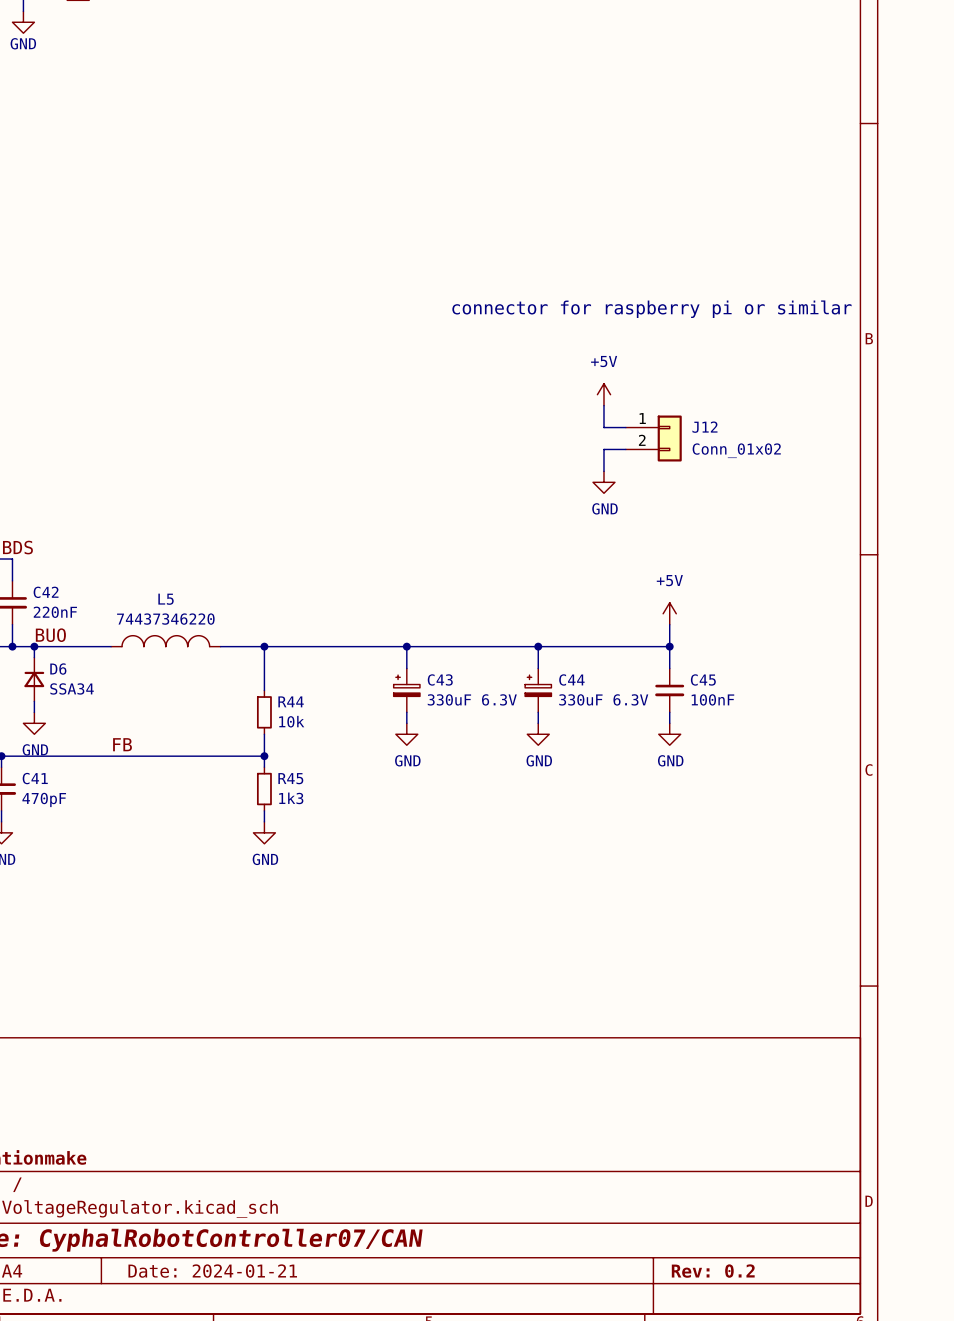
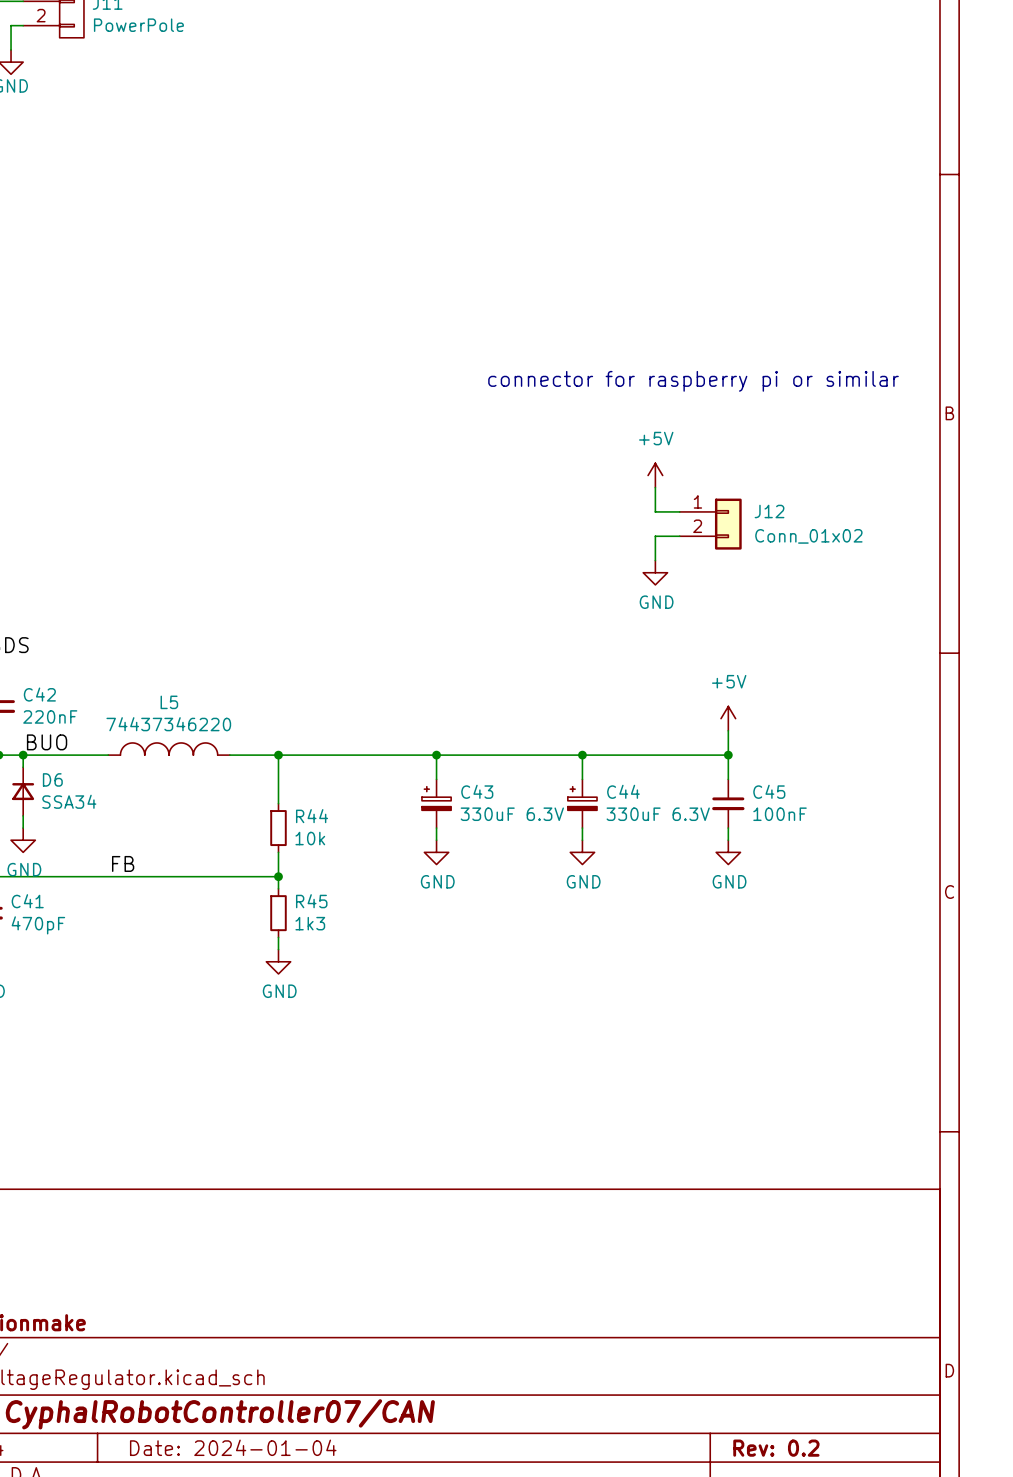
title block: Date: 2024-01-21 (212, 1271) -> Date: 2024-01-04 (233, 1447)

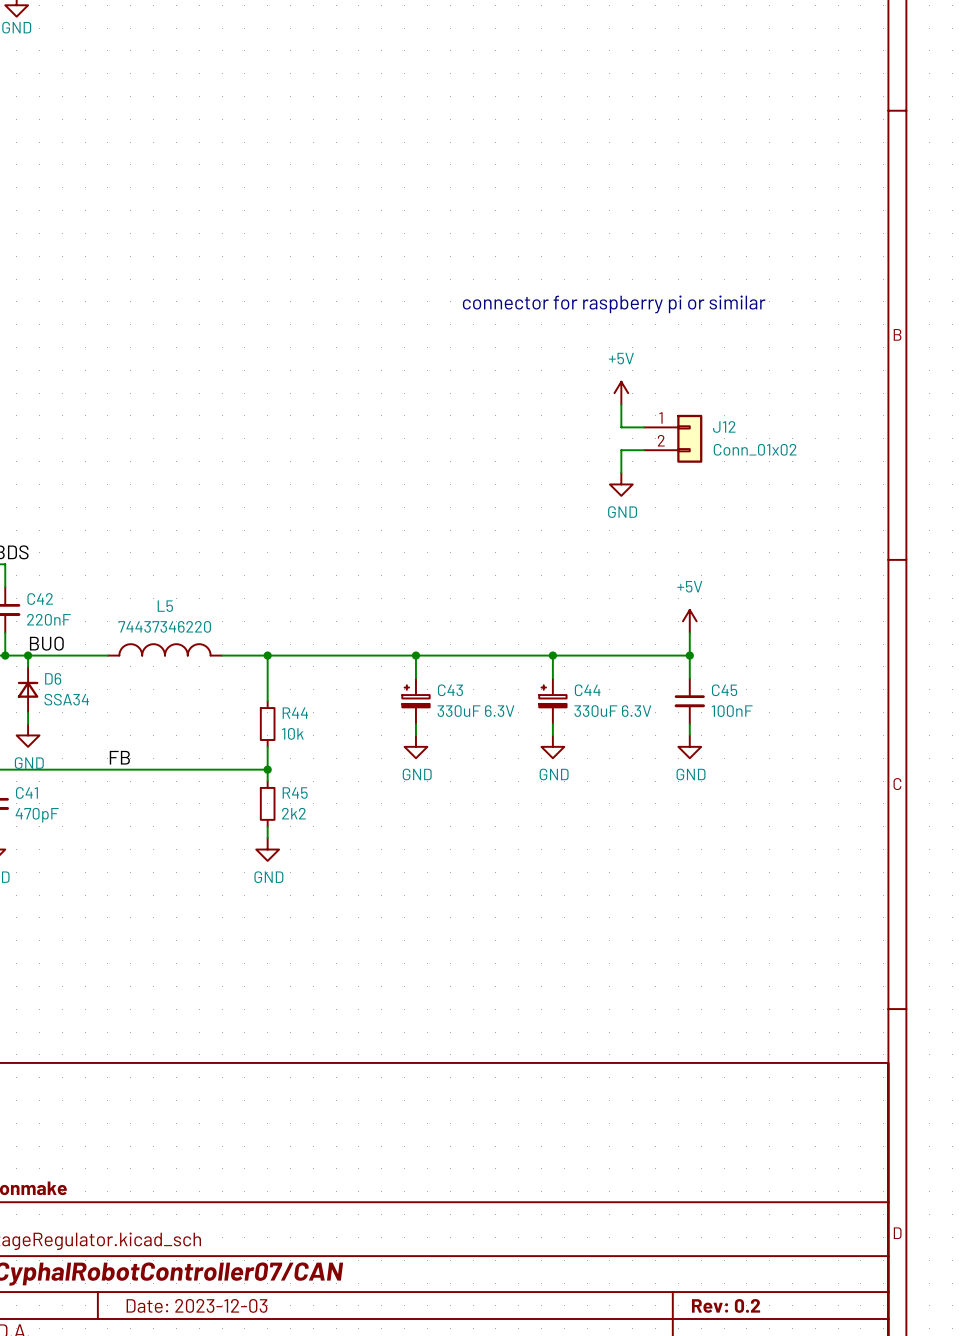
R45 value: 1k3 (310, 923) -> 2k2 (293, 813)
title block: Date: 2024-01-04 (233, 1447) -> Date: 2023-12-03 (197, 1305)

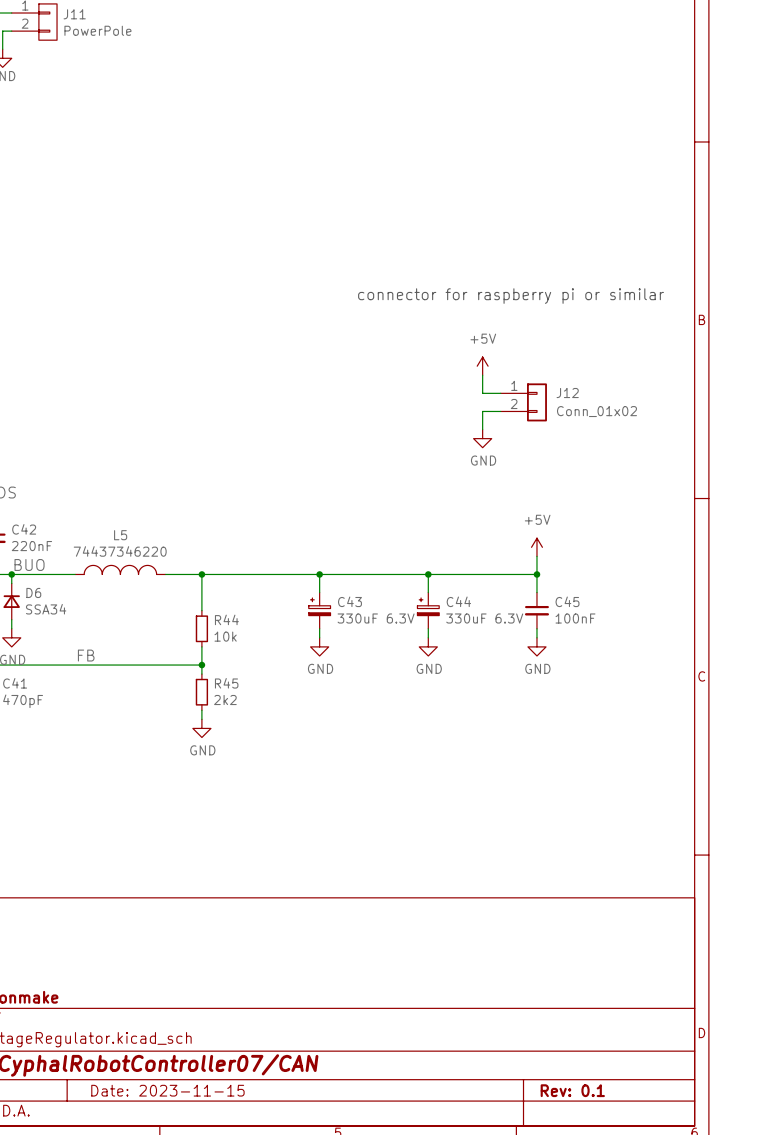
title block: Date: 2023-12-03 (197, 1305) -> Date: 2023-11-15 (167, 1090)
title block: Rev: 0.2 (726, 1305) -> Rev: 0.1 (572, 1090)

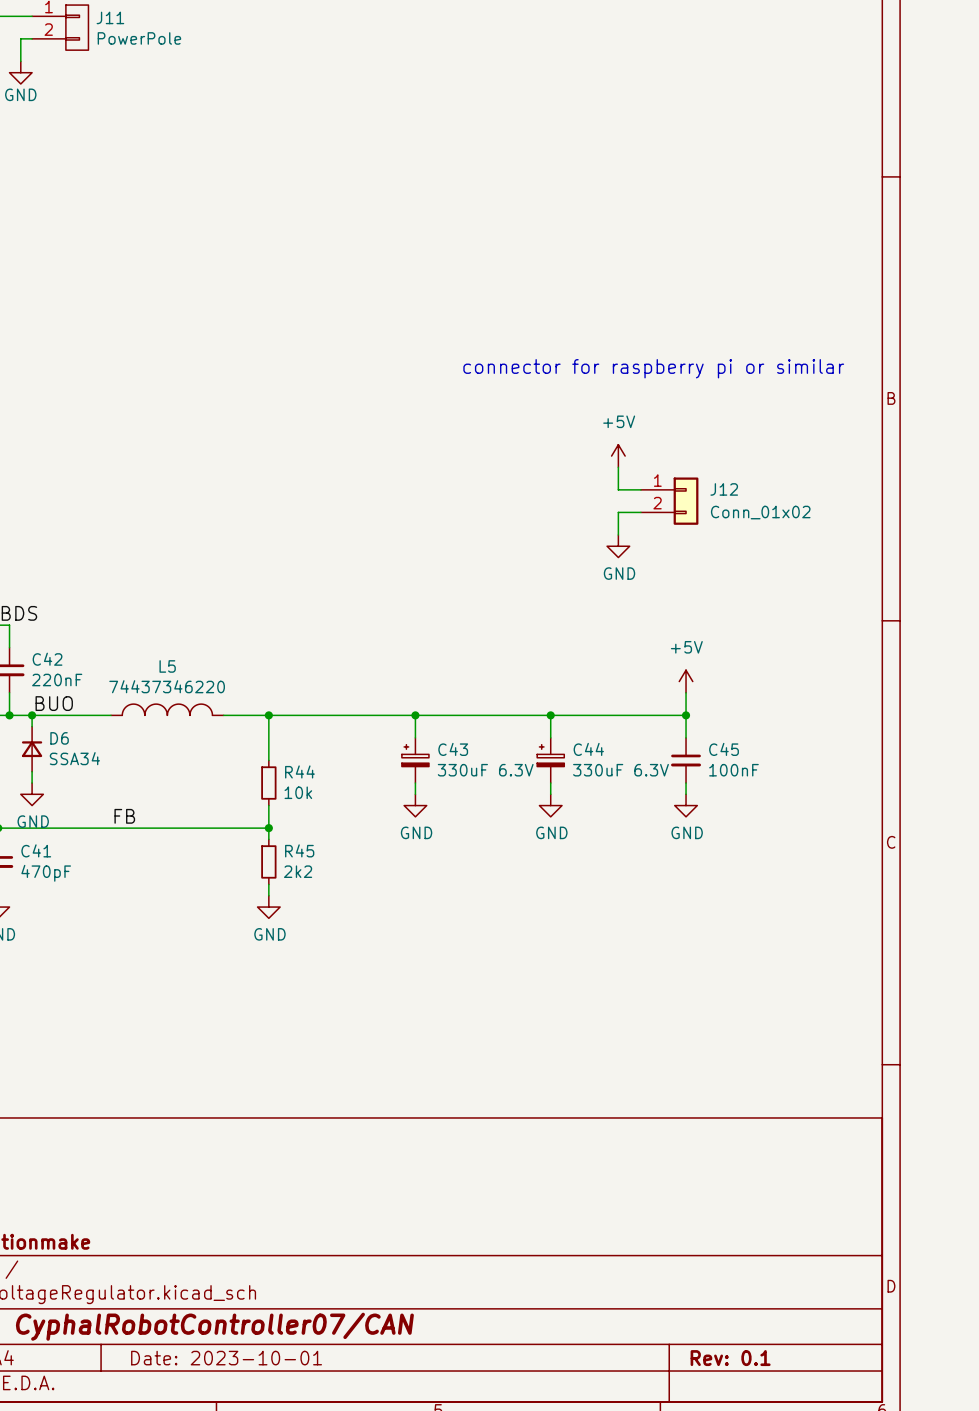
title block: Date: 2023-11-15 (167, 1090) -> Date: 2023-10-01 (226, 1358)

